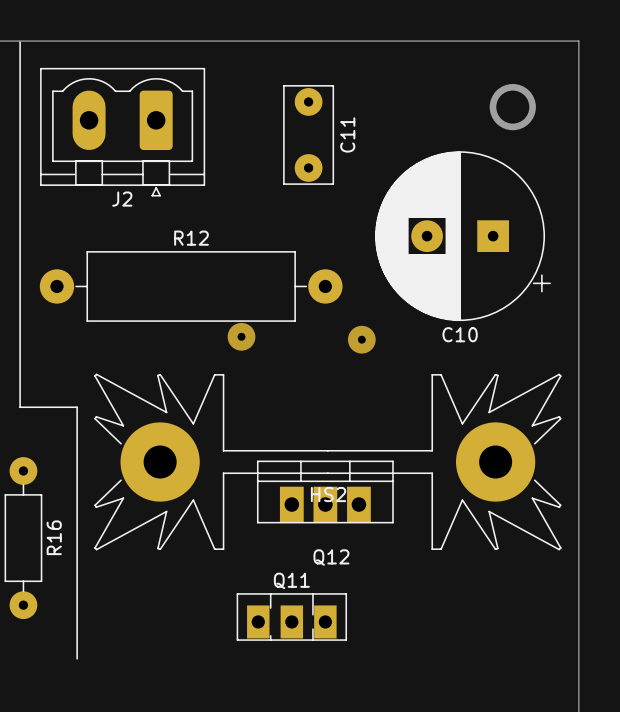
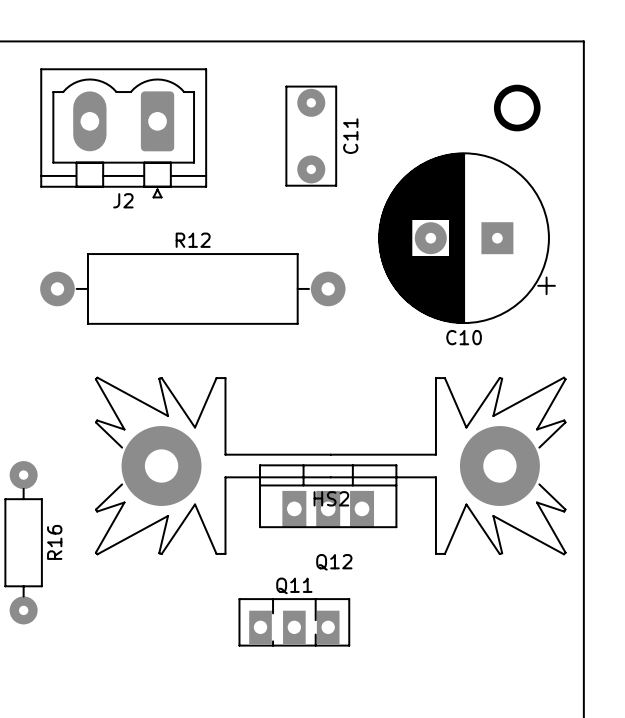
line: (20, 41) (20, 407) (77, 407) (77, 658) -> none
via: (241, 336) -> none
via: (361, 339) -> none

